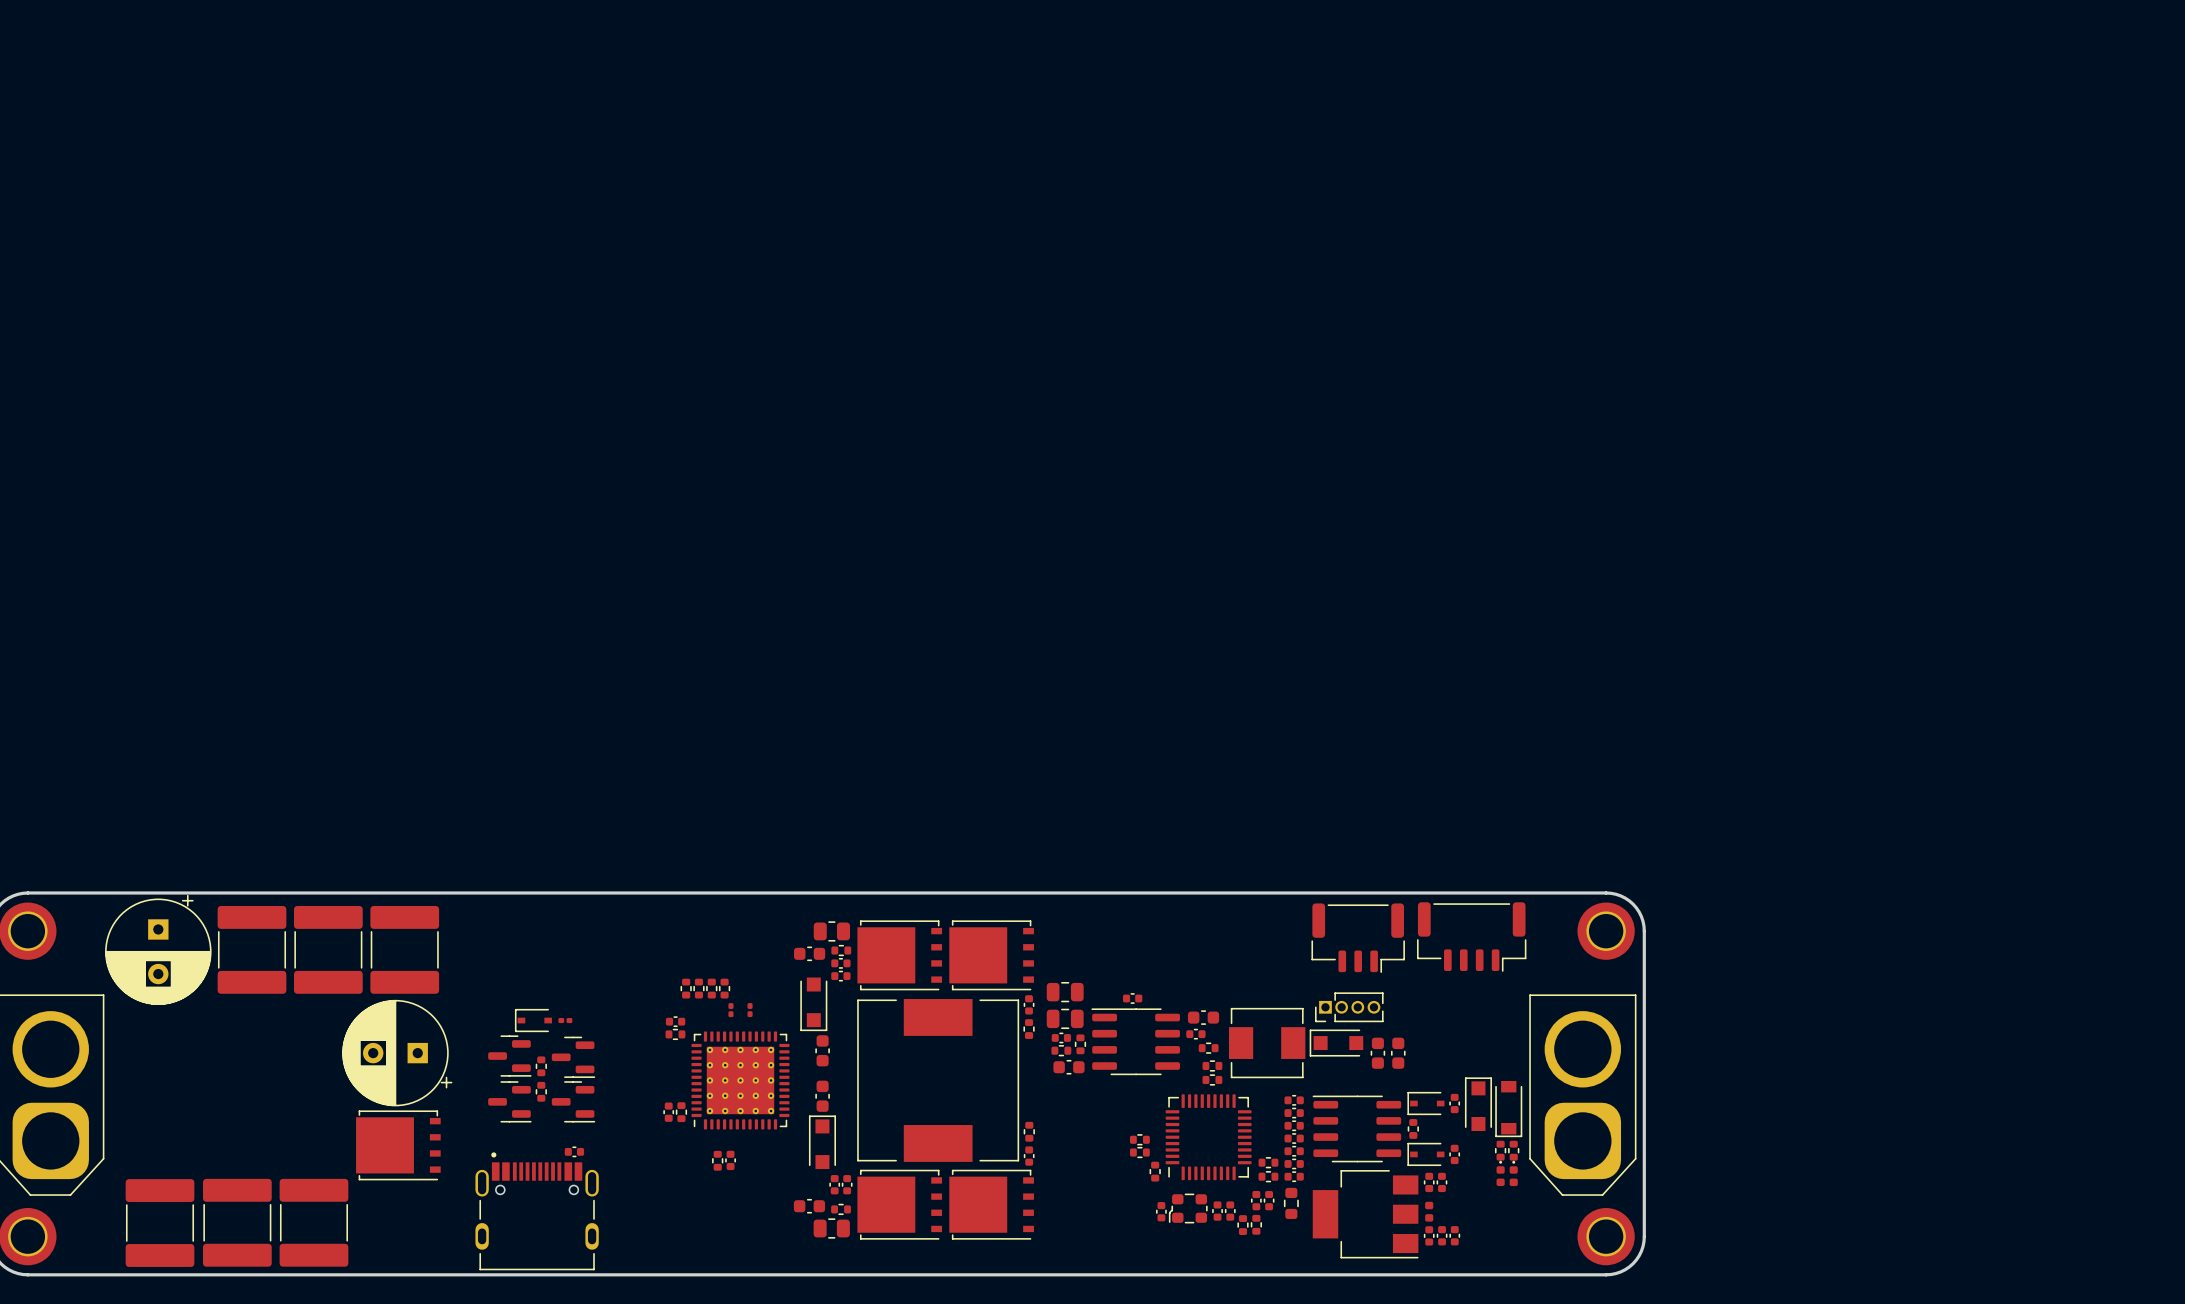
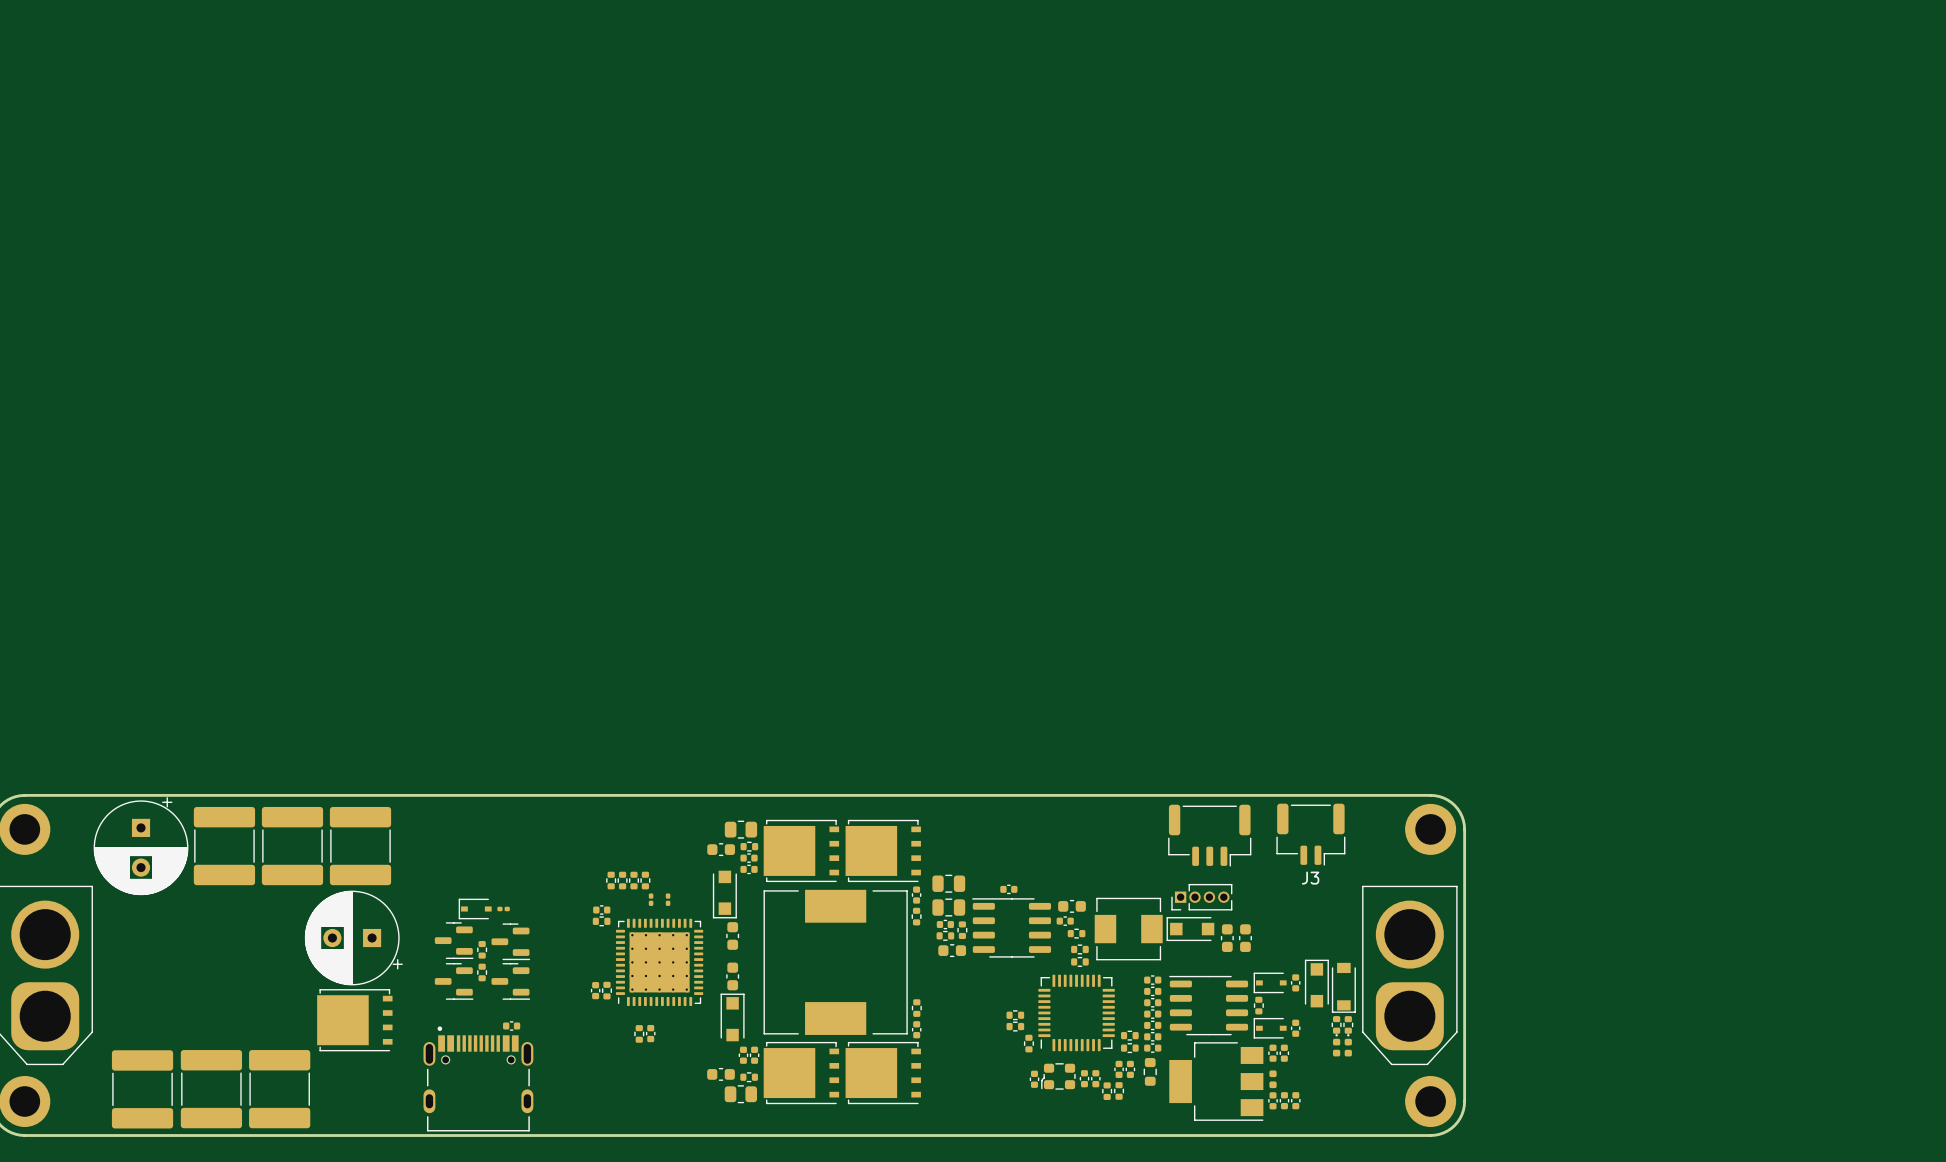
part: (1471, 937) -> none
J3: none -> (1310, 834)

